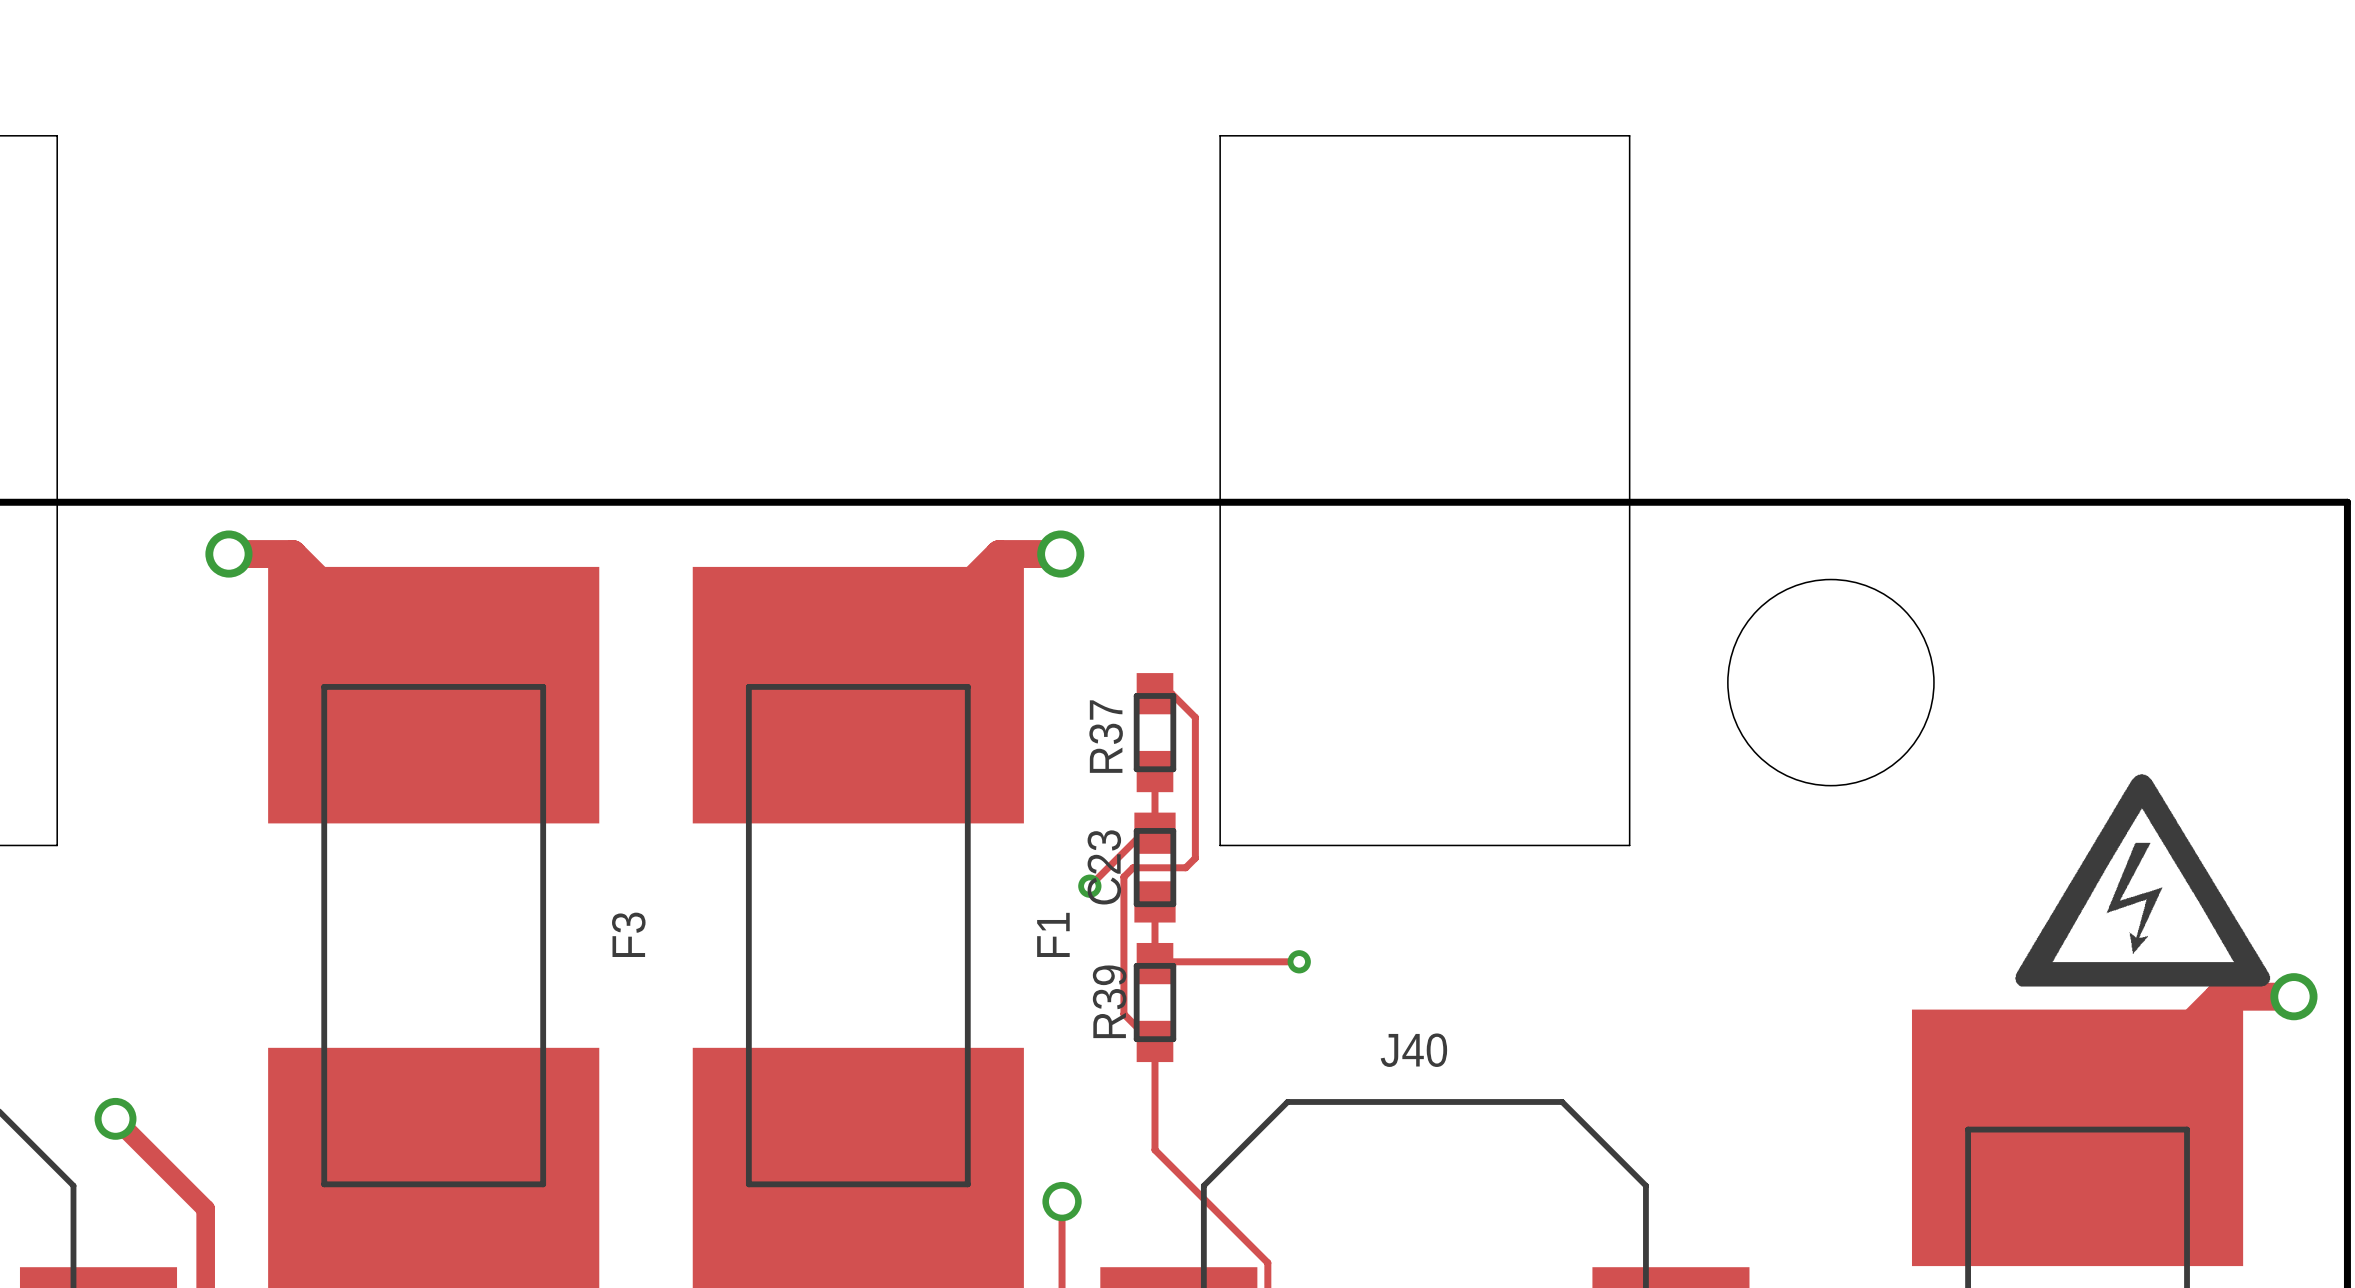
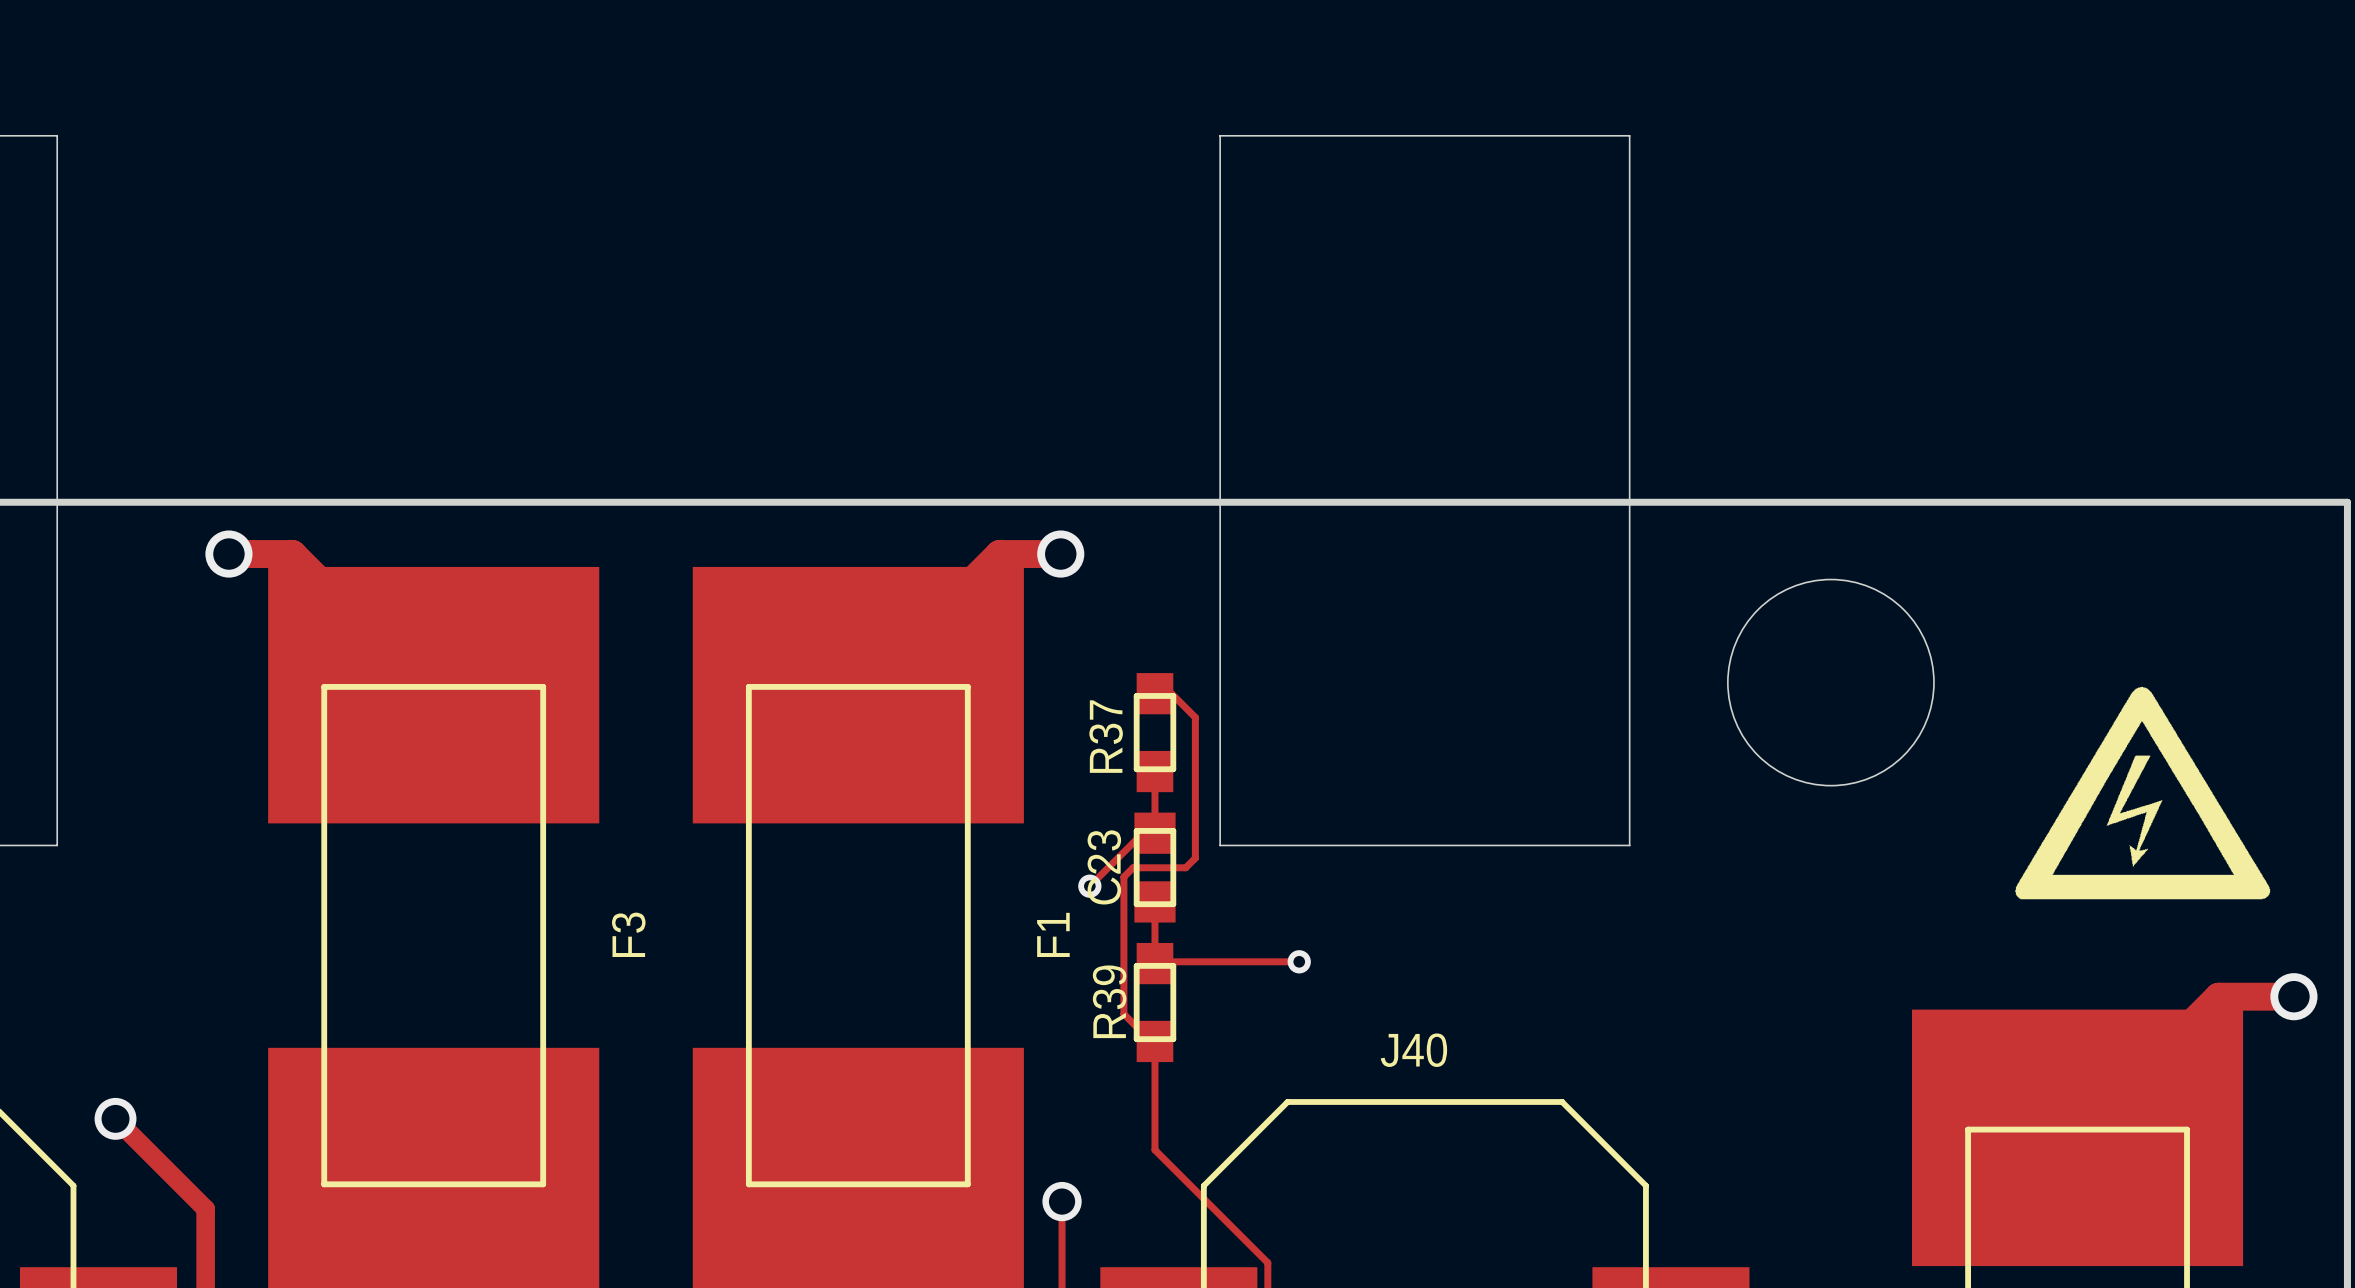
drawing position: (2142, 880) -> (2142, 793)

